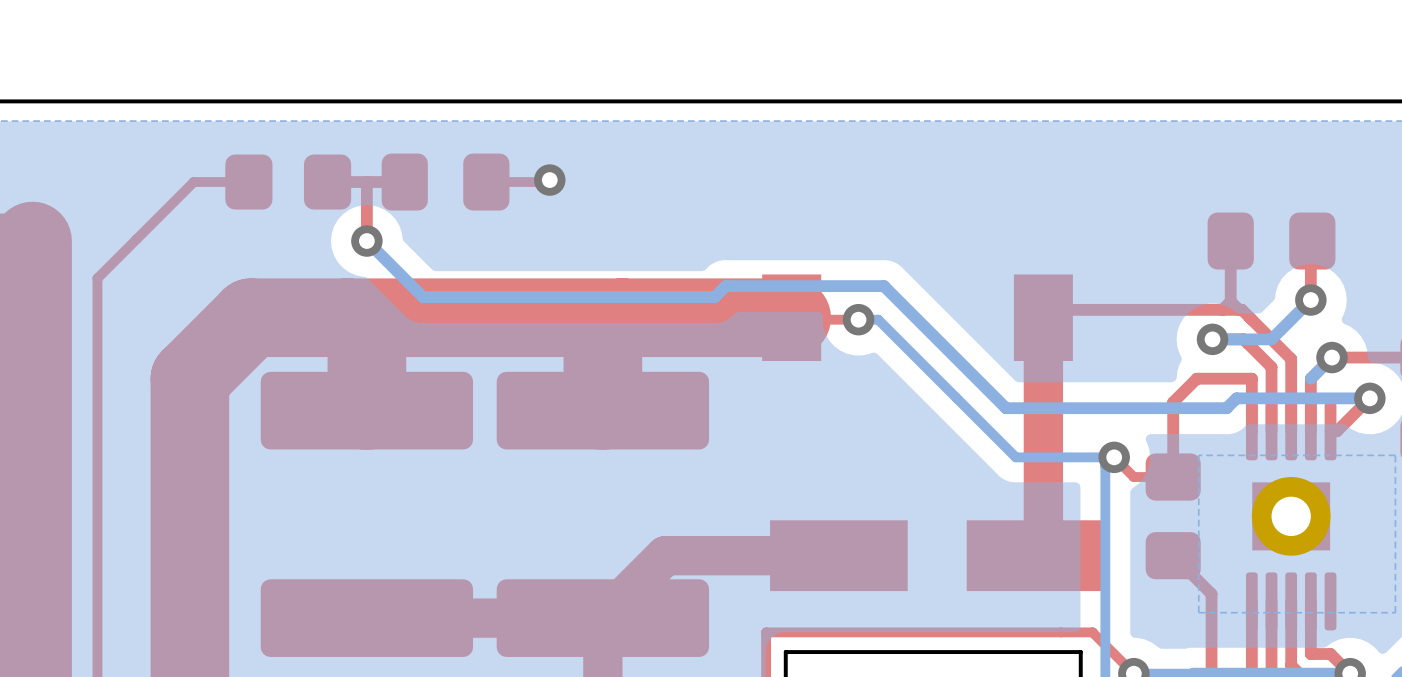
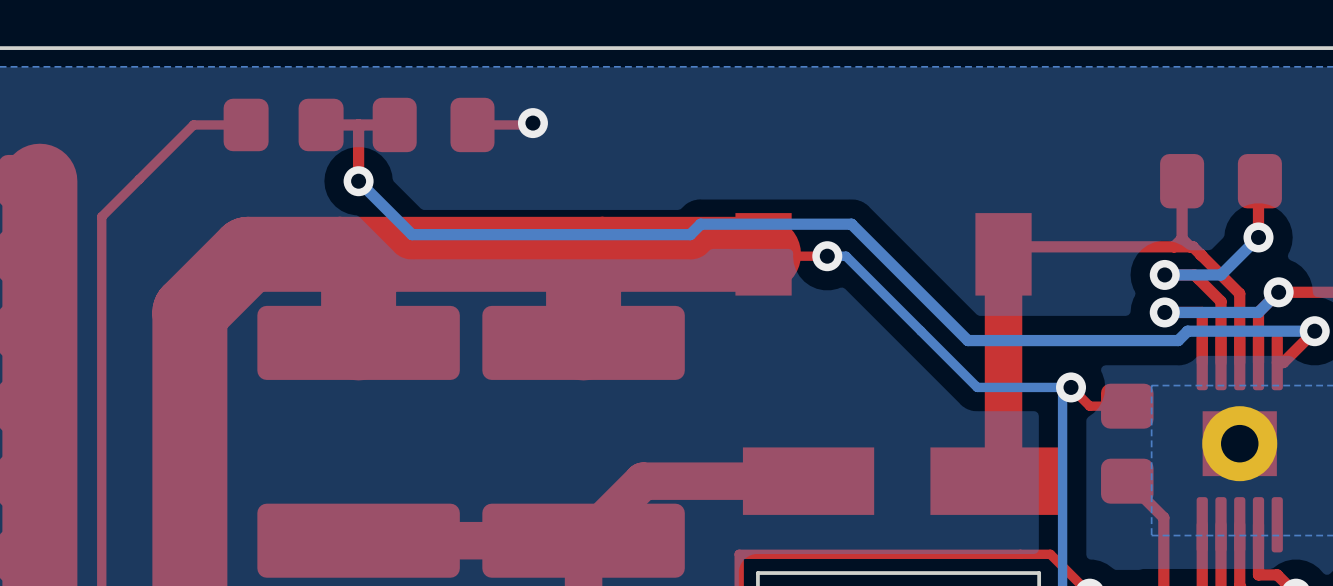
top track: (1212, 378) (1196, 378) (1173, 402) (1173, 477) -> none
via: none -> (1164, 312)
bottom track: none -> (1258, 312) (1164, 312)

